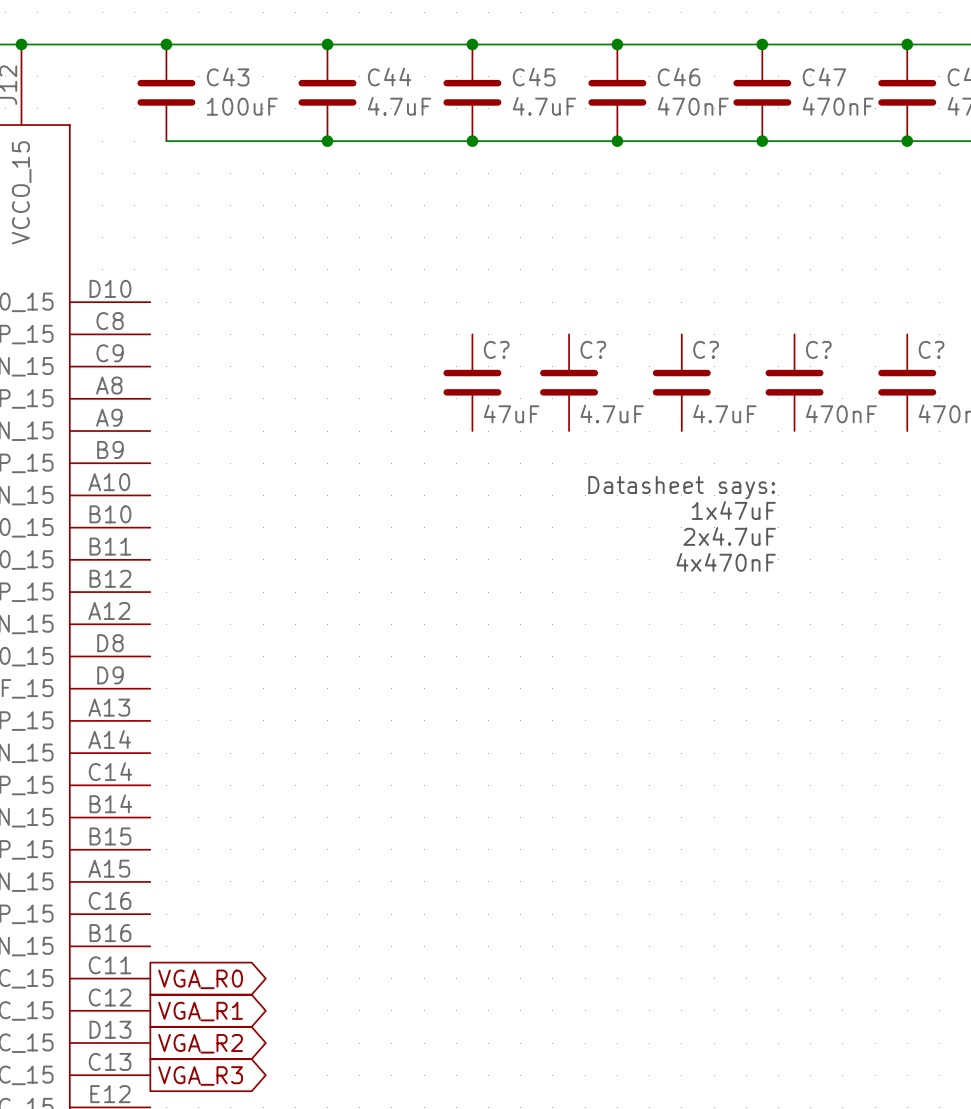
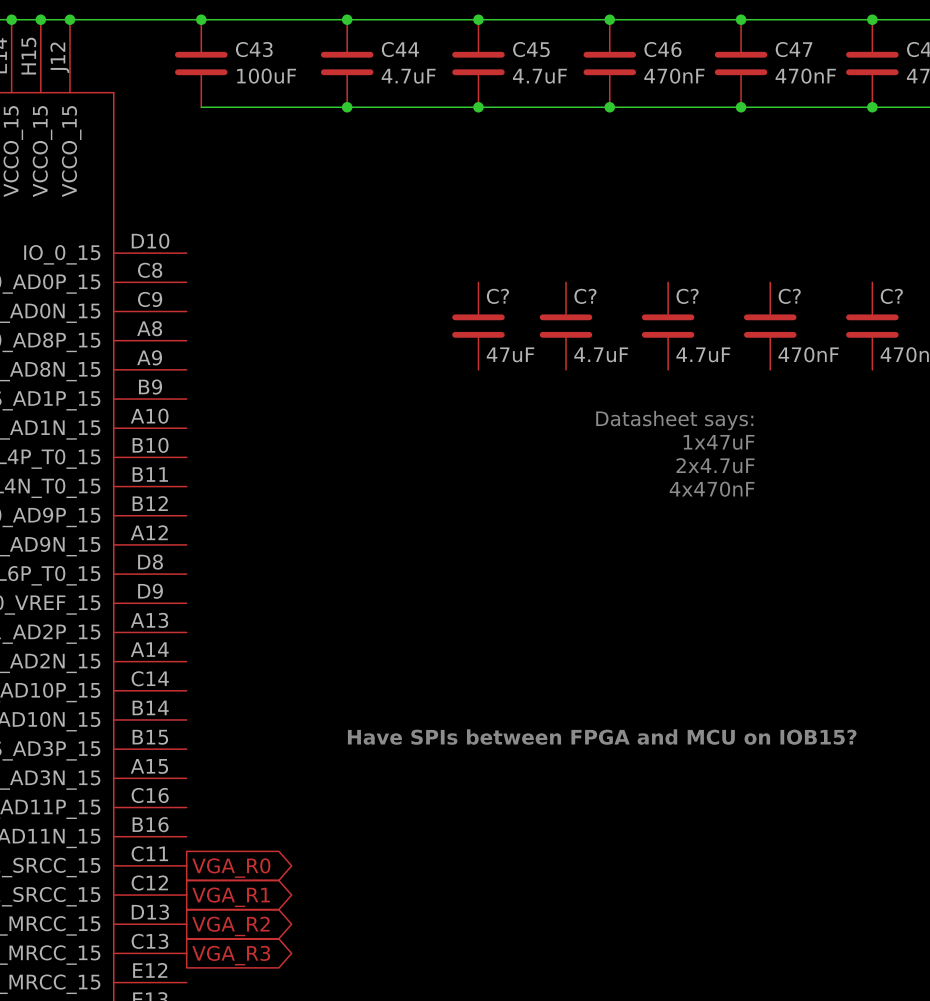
text: none -> Have SPIs between FPGA and MCU on IOB15? (602, 737)

